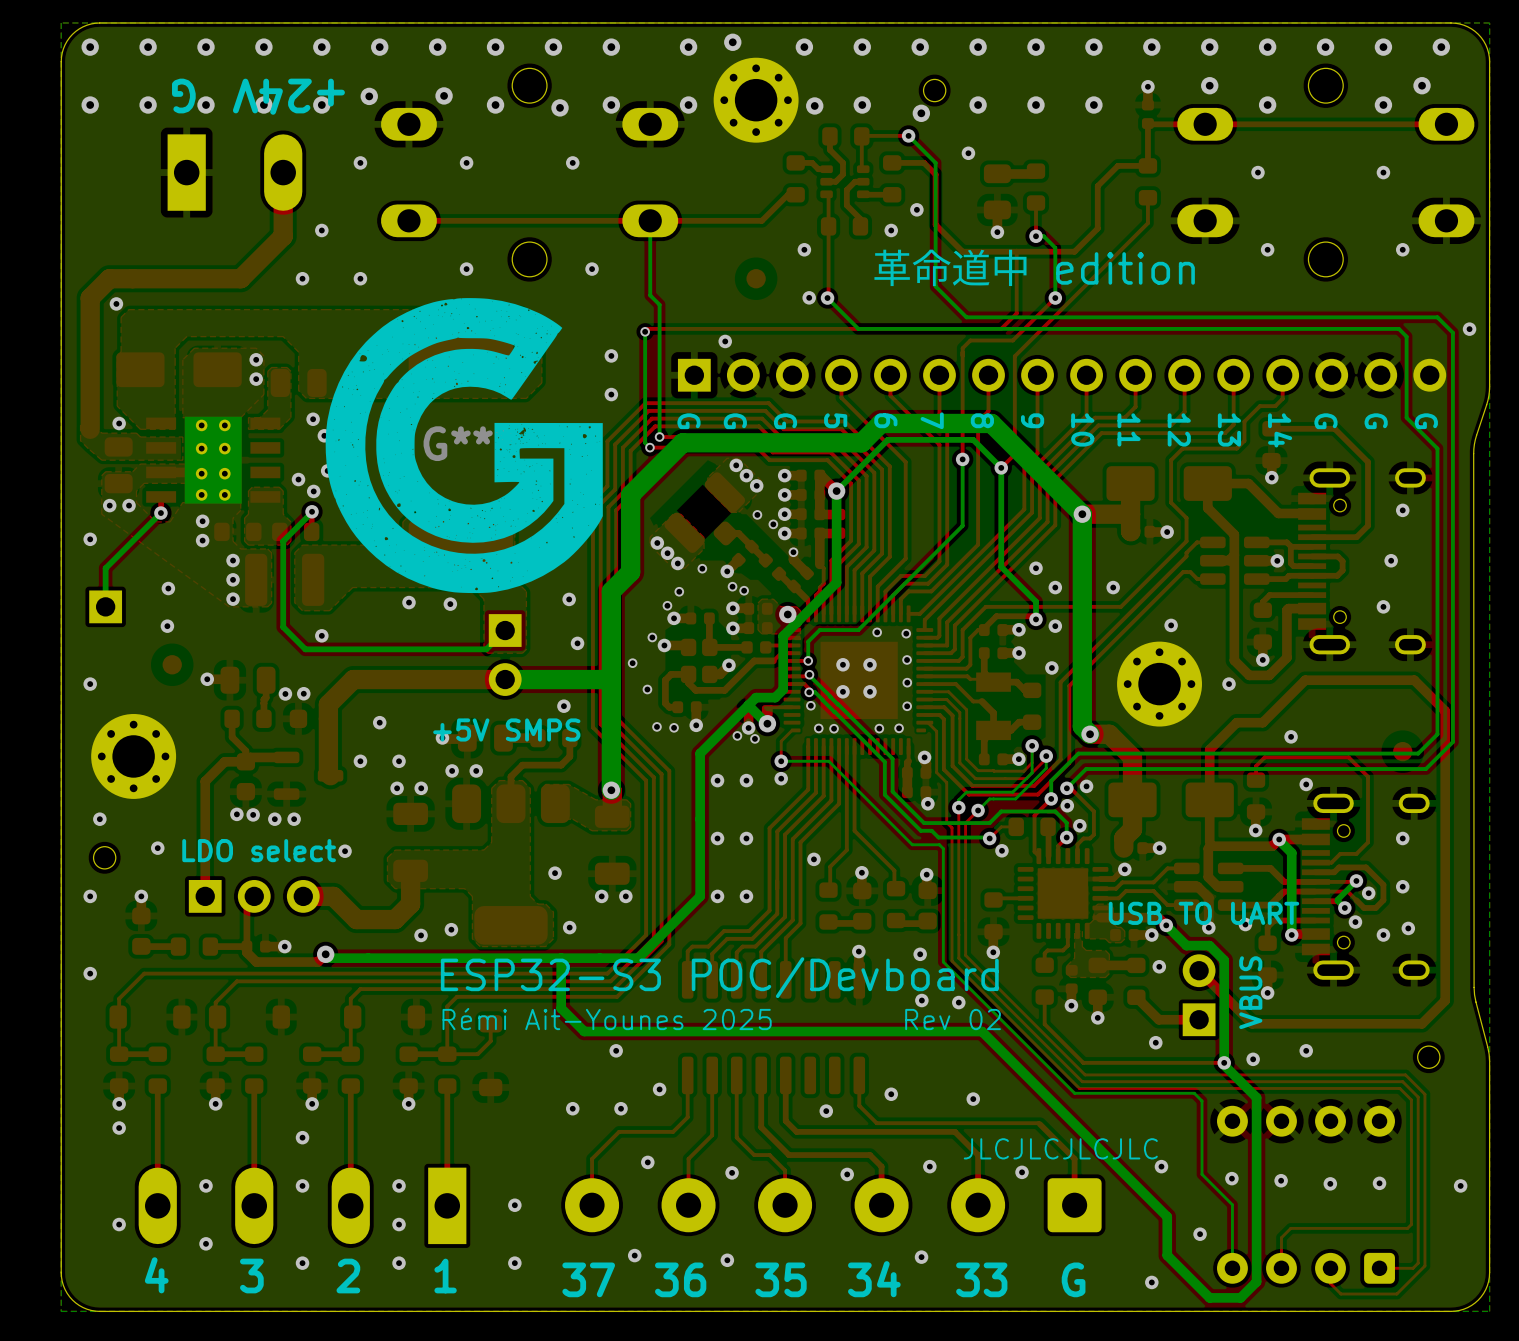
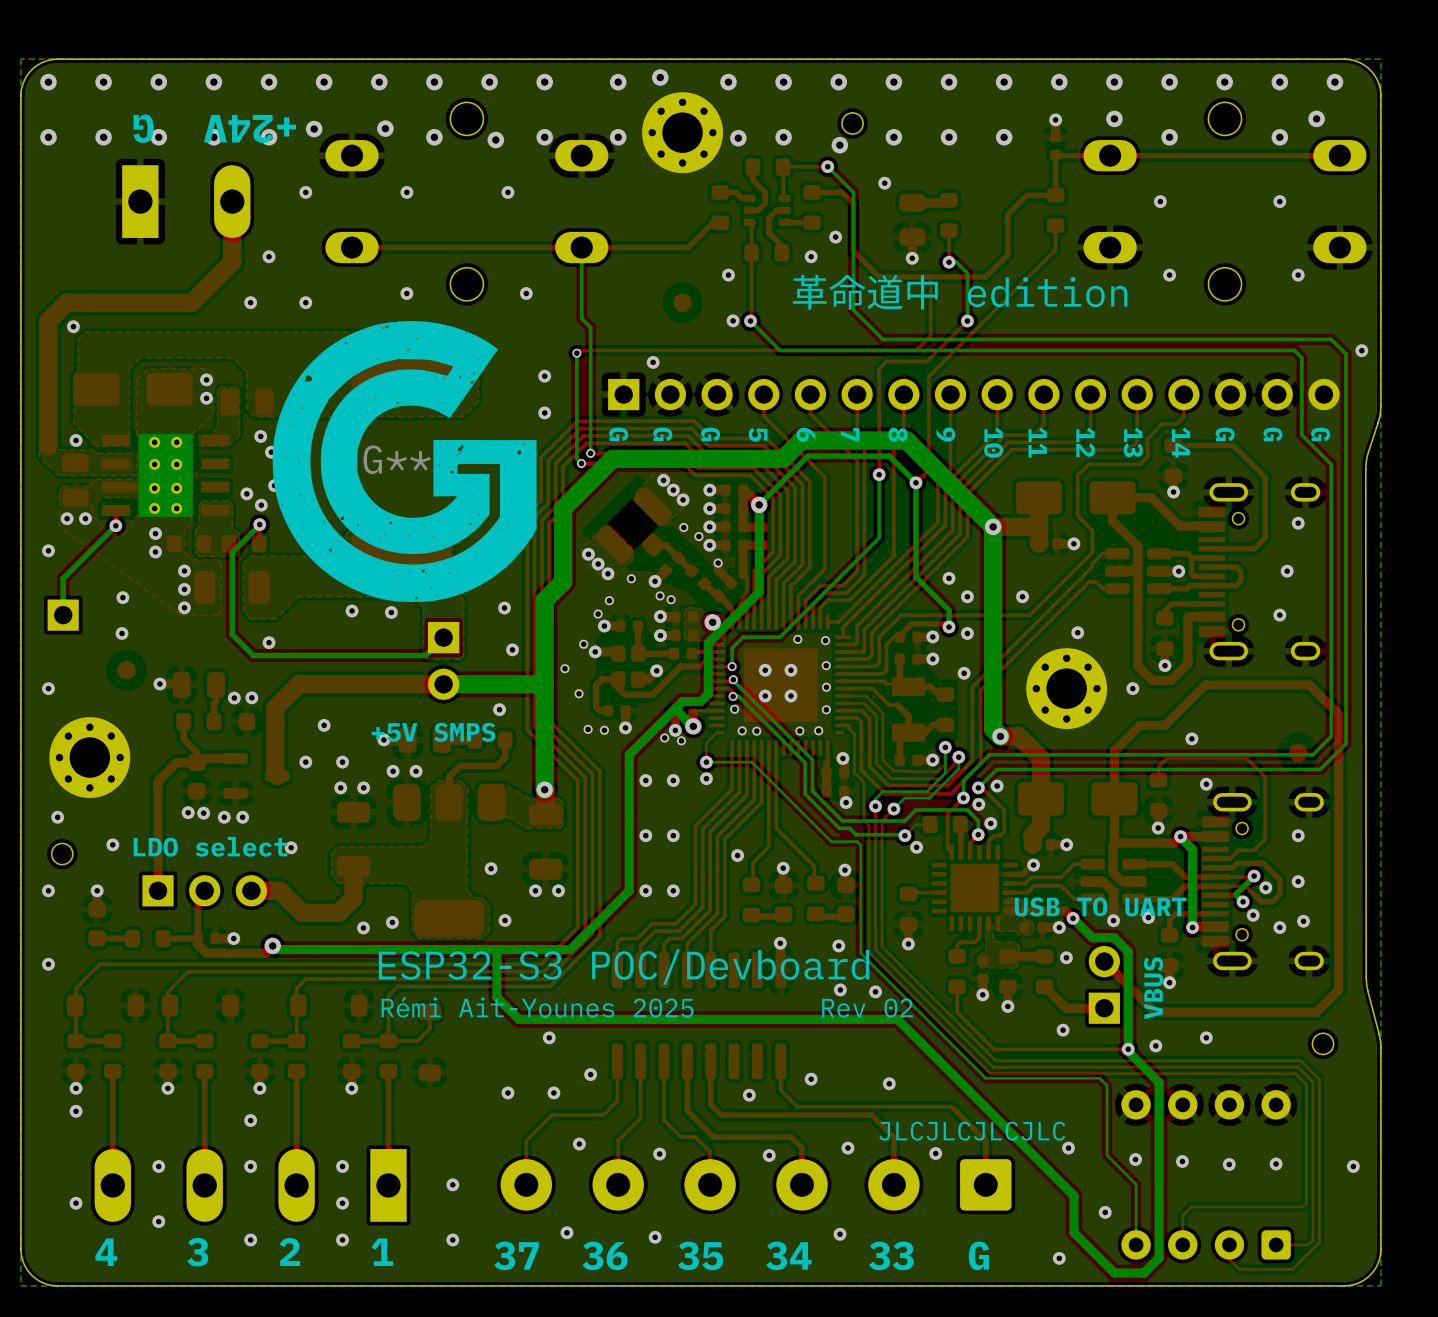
part footprint: [245, 553, 325, 606] -> [194, 571, 270, 605]

